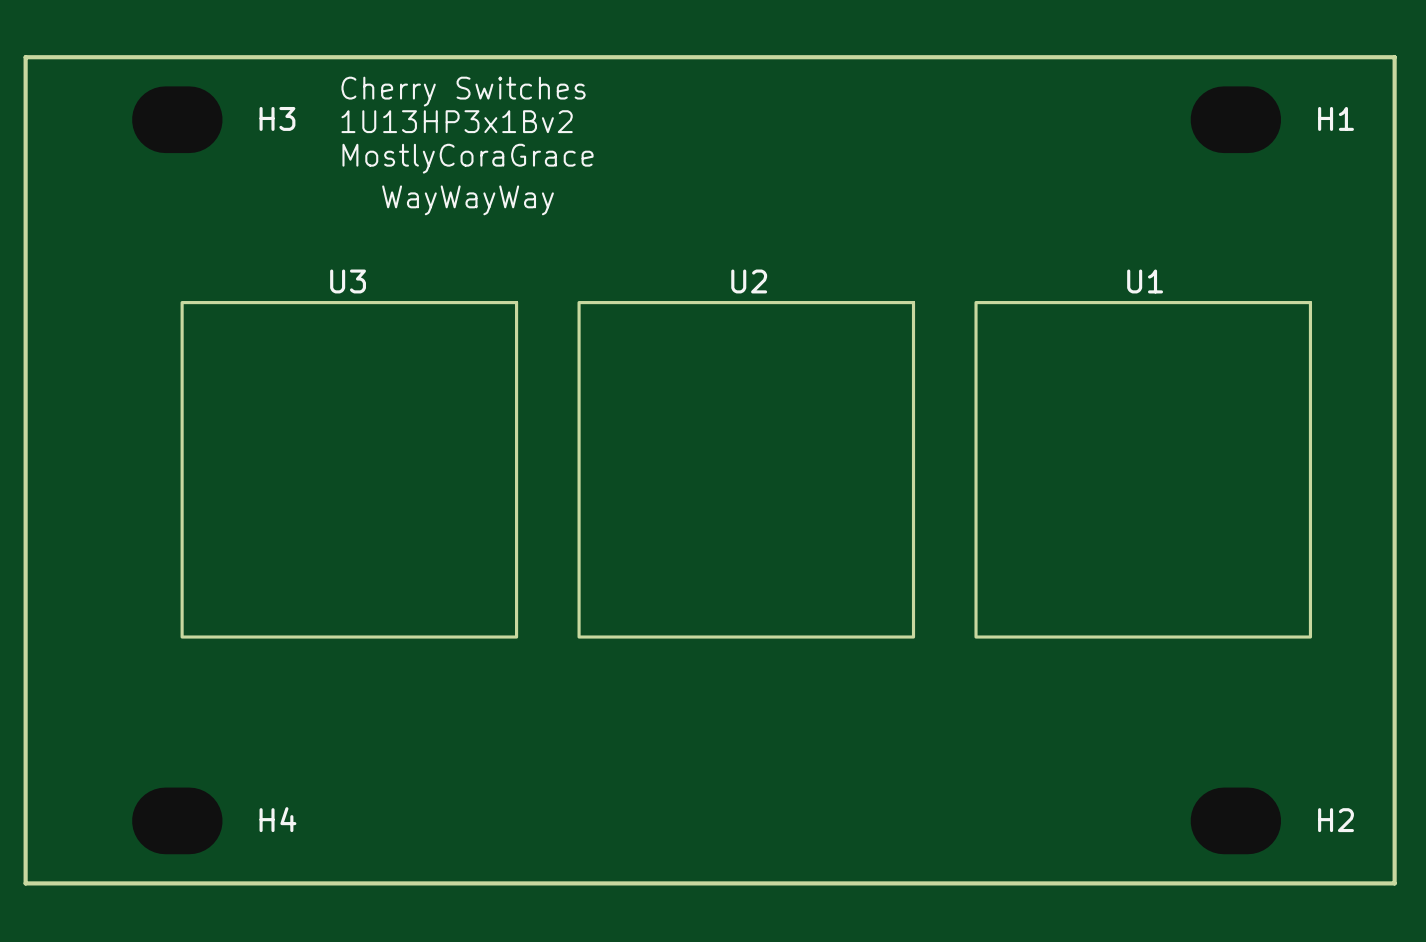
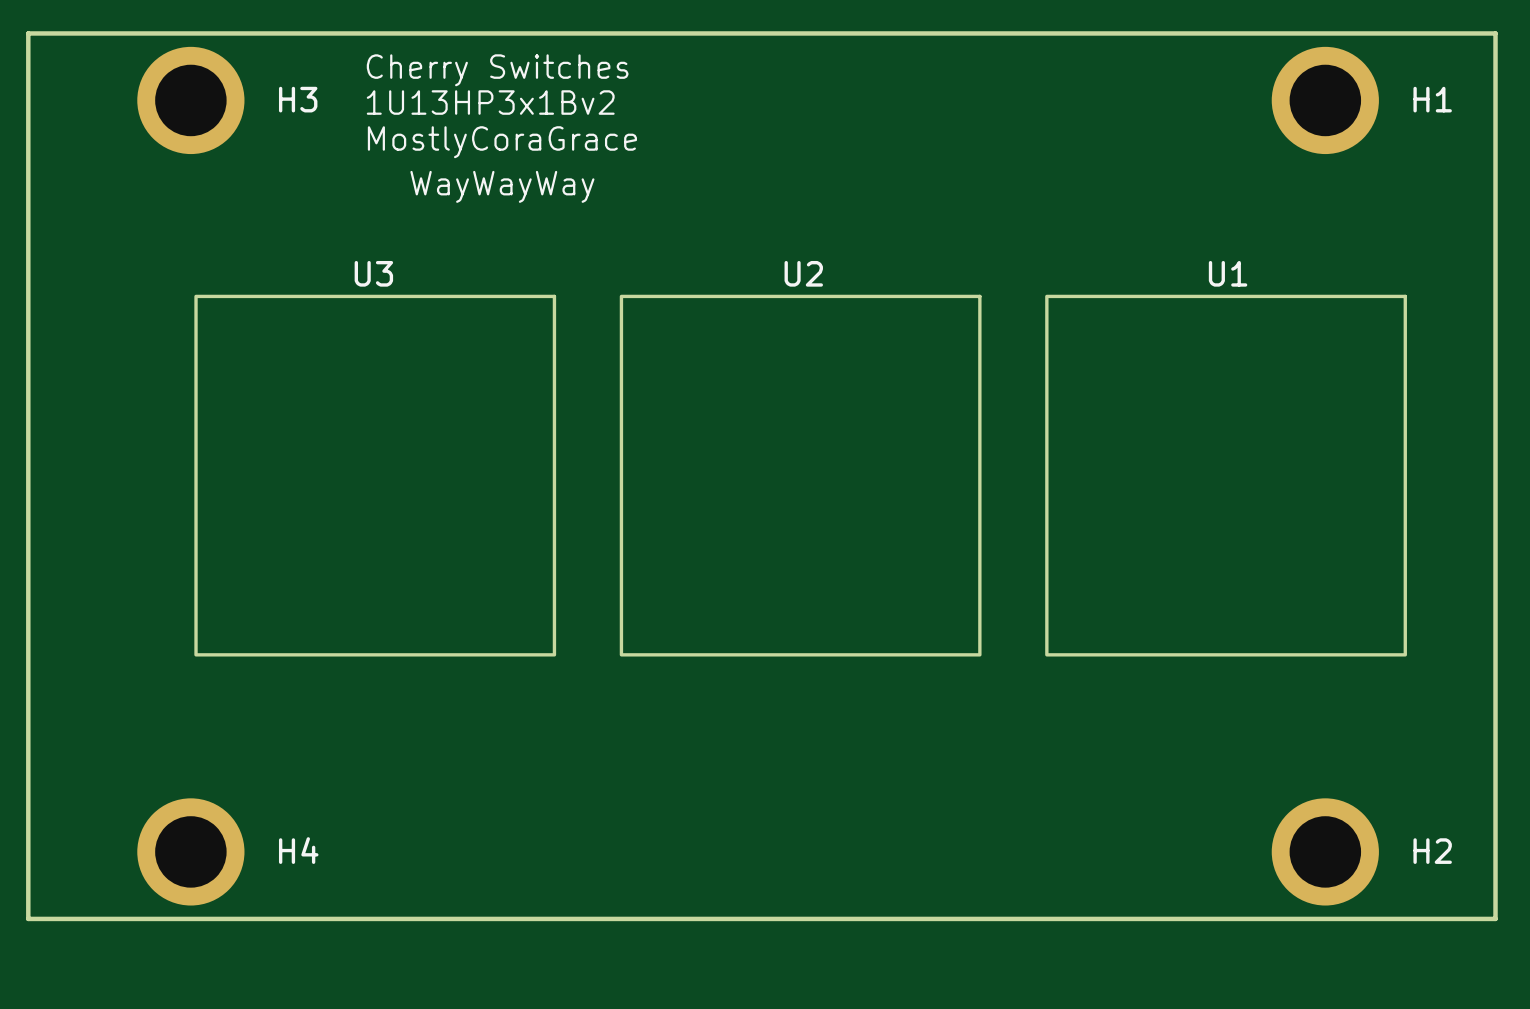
H3 footprint: [132, 86, 223, 154] -> [137, 46, 245, 155]
H1 footprint: [1190, 86, 1282, 154] -> [1271, 46, 1379, 155]
H4 footprint: [132, 787, 223, 855] -> [137, 798, 245, 906]
H2 footprint: [1190, 787, 1282, 855] -> [1271, 798, 1379, 906]

